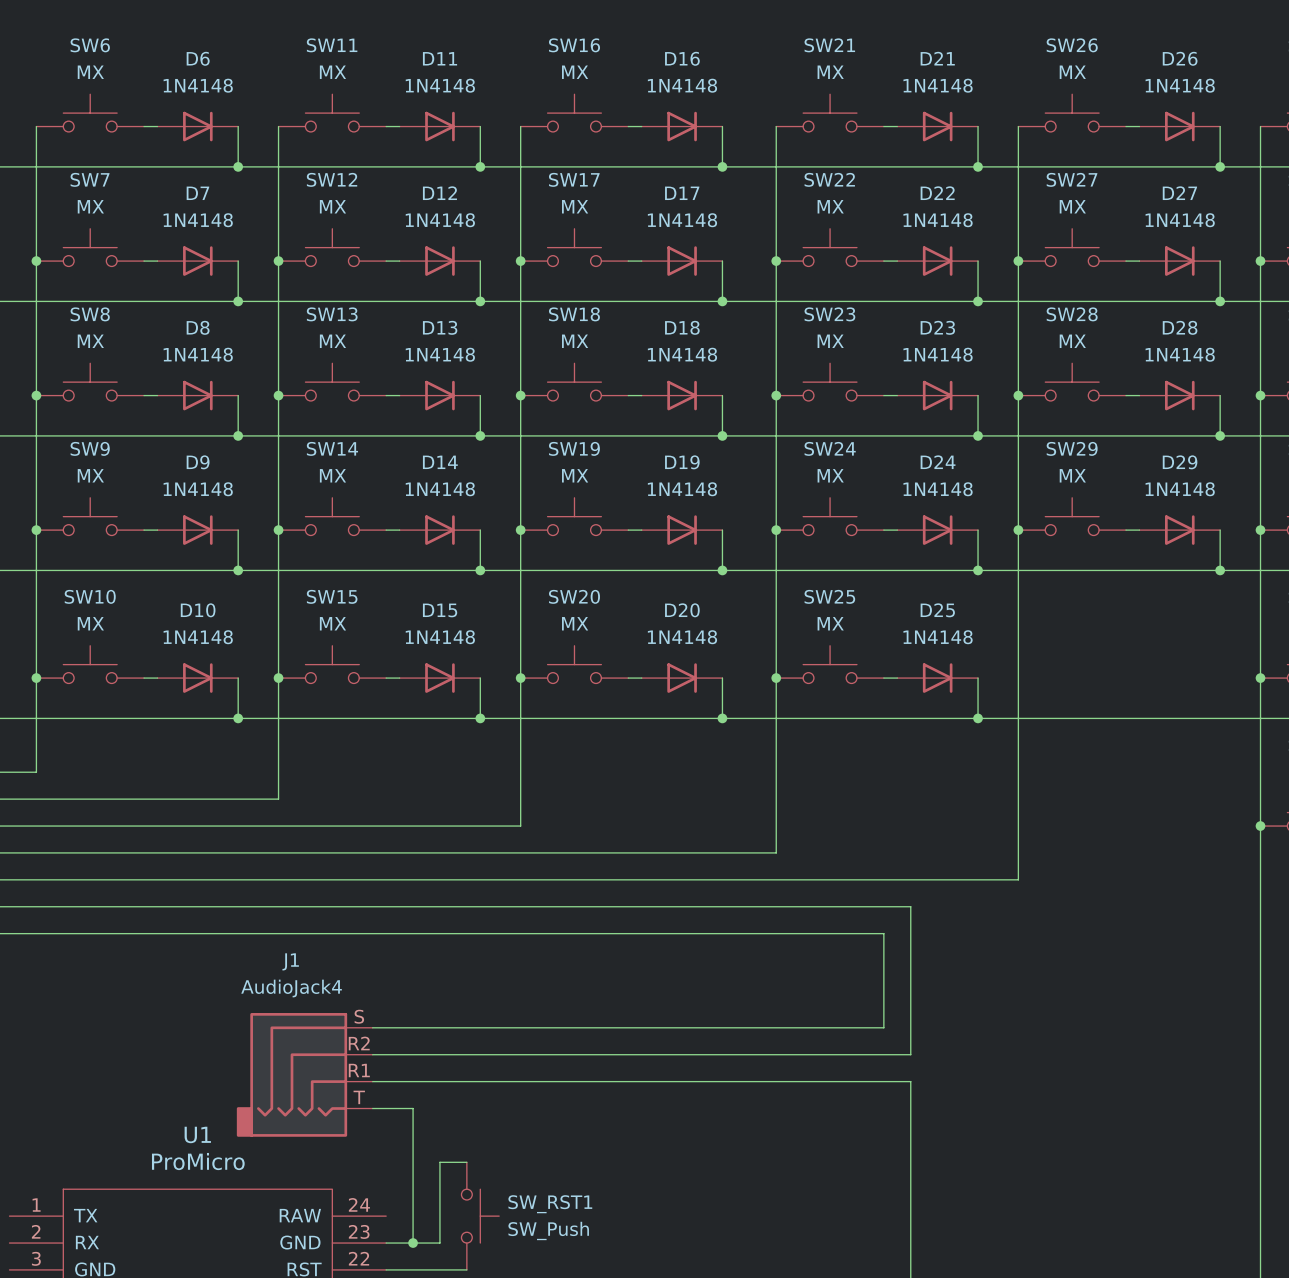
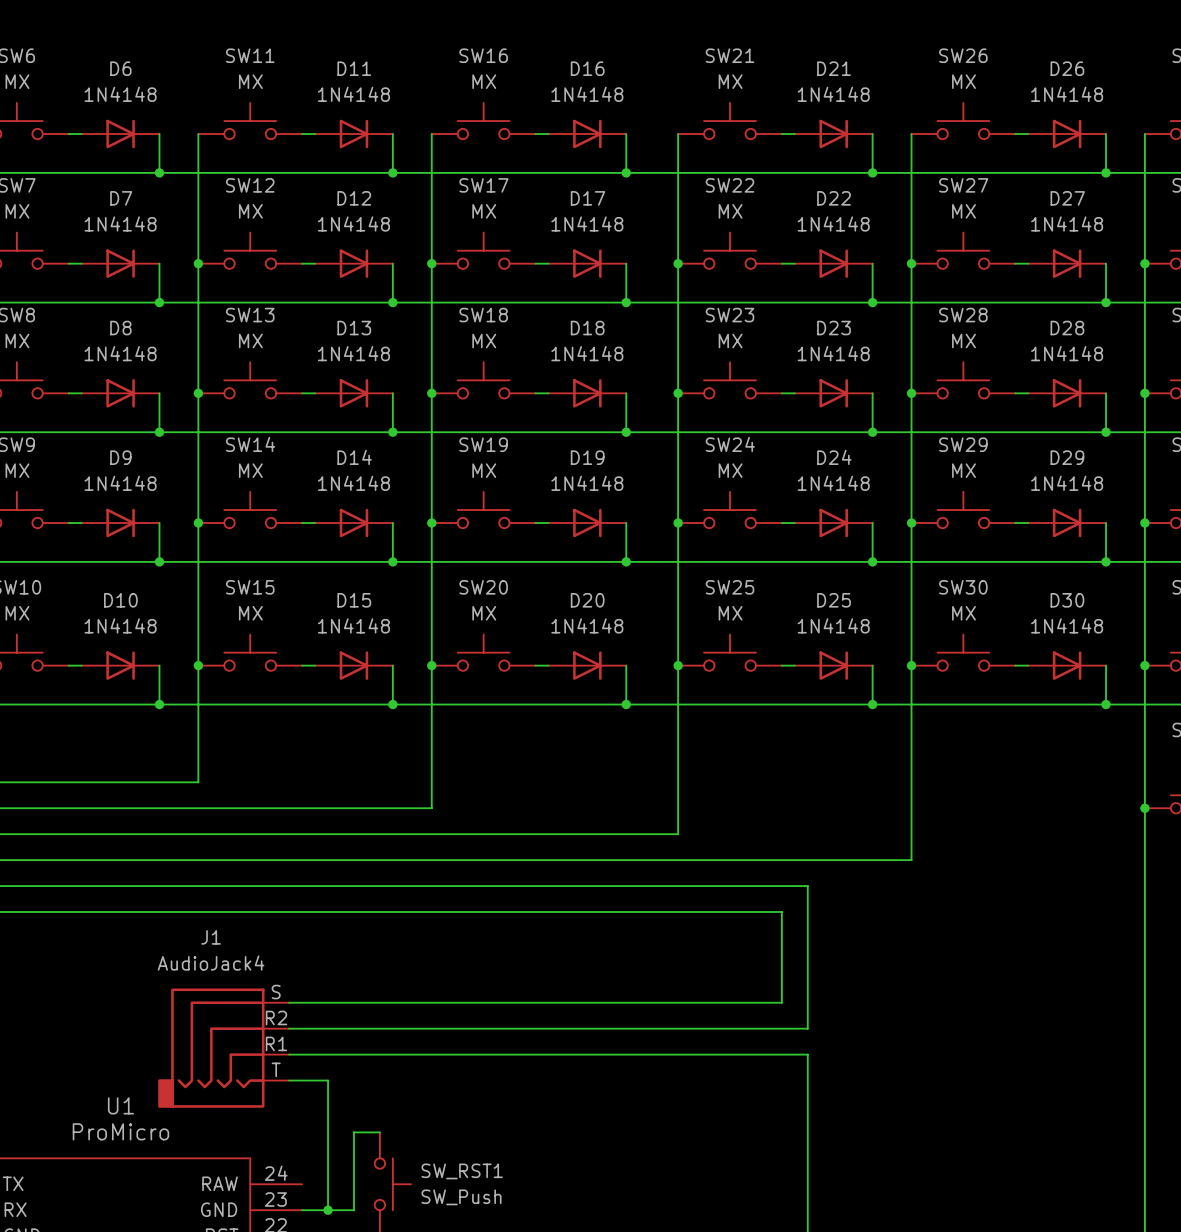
SW30: none -> MX (963, 652)
junction: none -> (911, 665)
wire: none -> (1015, 665) (1028, 665)
D30: none -> 1N4148 (1067, 665)
wire: none -> (1106, 665) (1106, 704)
junction: none -> (1106, 704)

